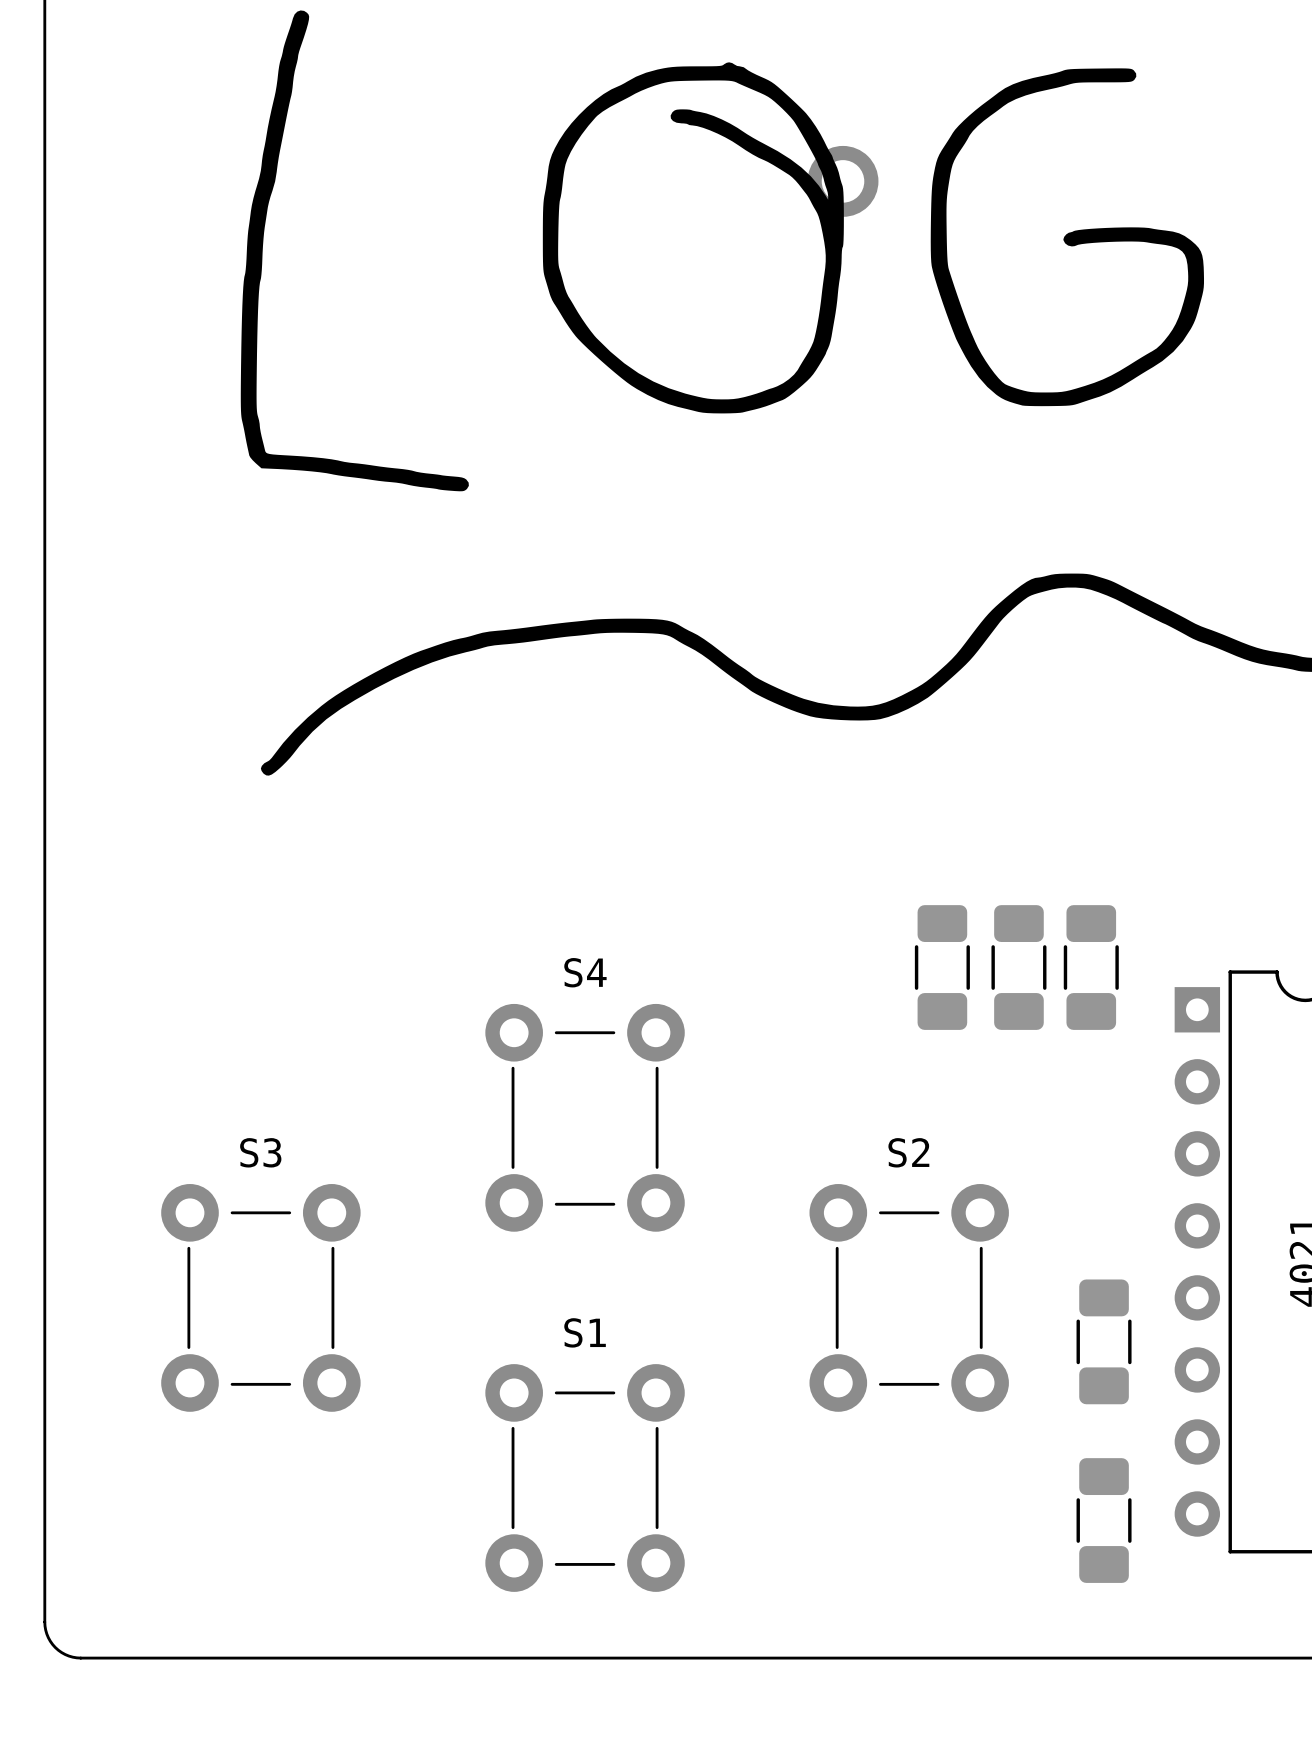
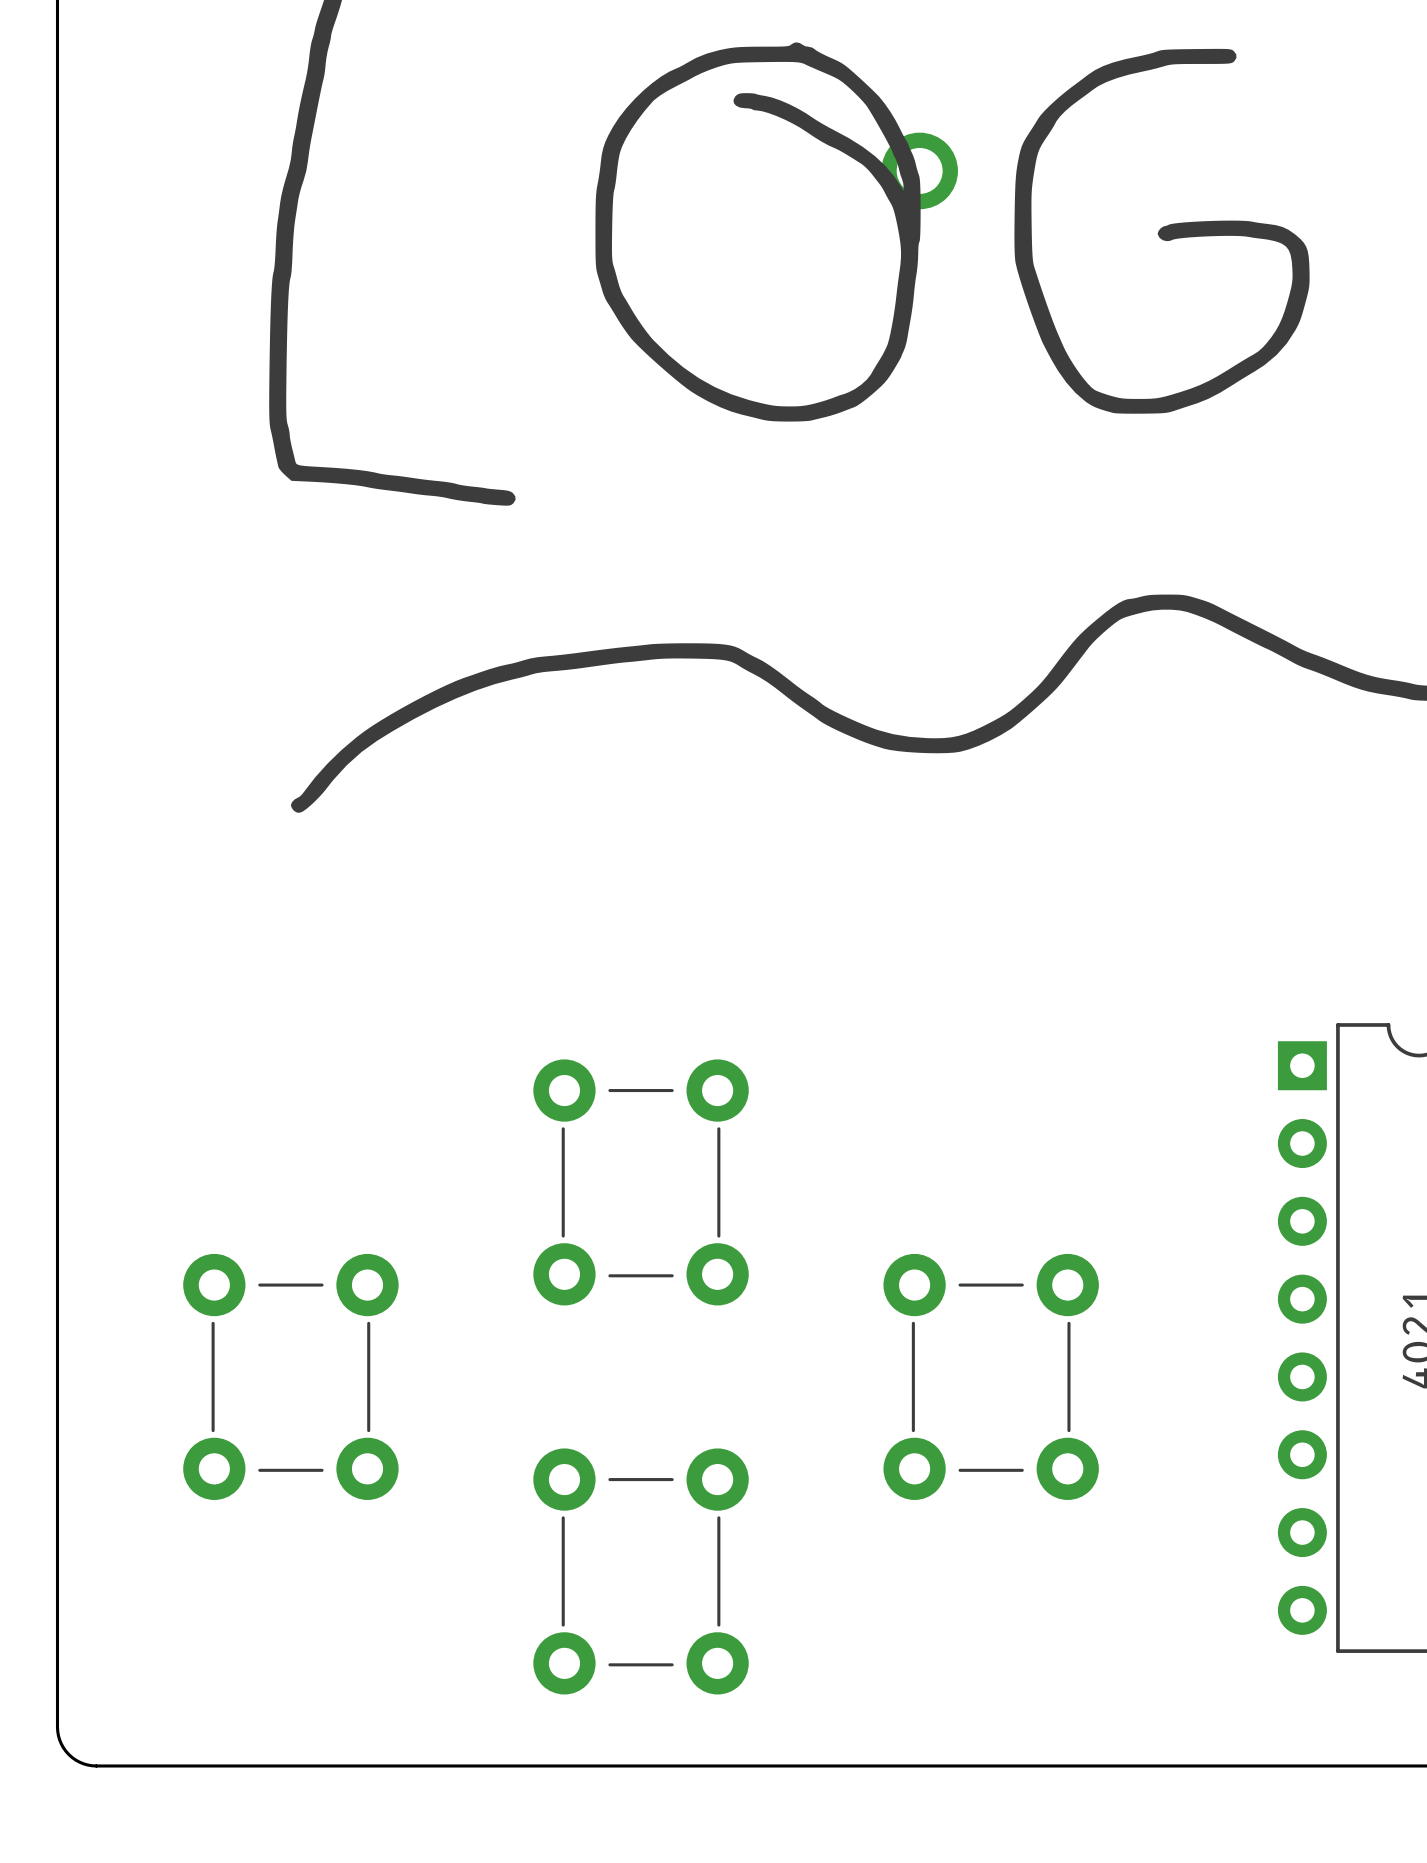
part: (942, 967) -> none
part: (1018, 967) -> none
part: (1091, 967) -> none
S4 name: S4 (585, 972) -> none
S3 name: S3 (260, 1152) -> none
S2 name: S2 (908, 1152) -> none
S1 name: S1 (585, 1332) -> none
part: (1104, 1341) -> none
part: (1104, 1520) -> none

